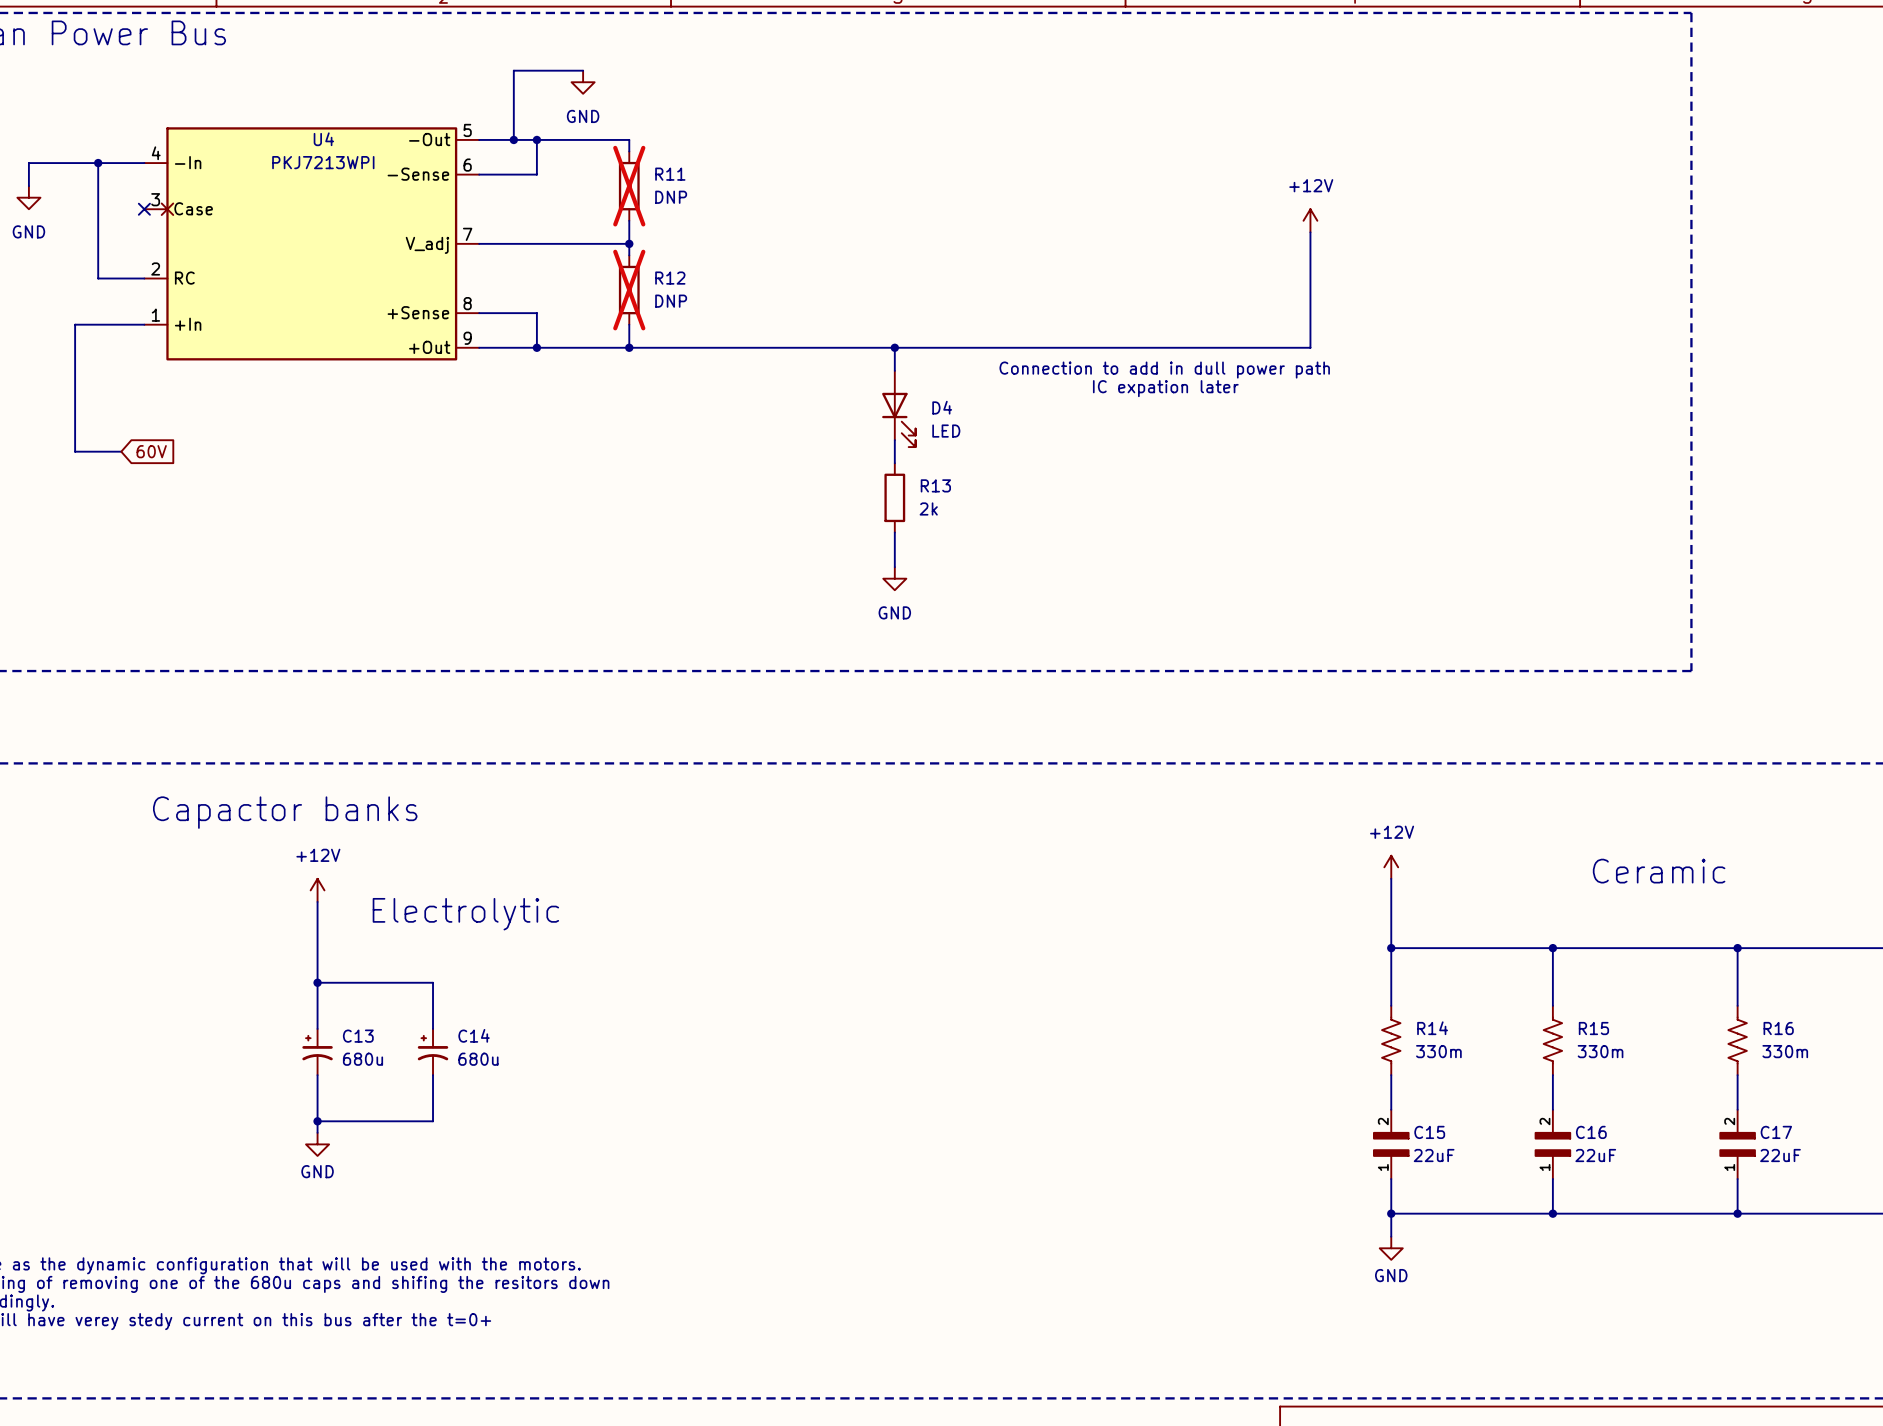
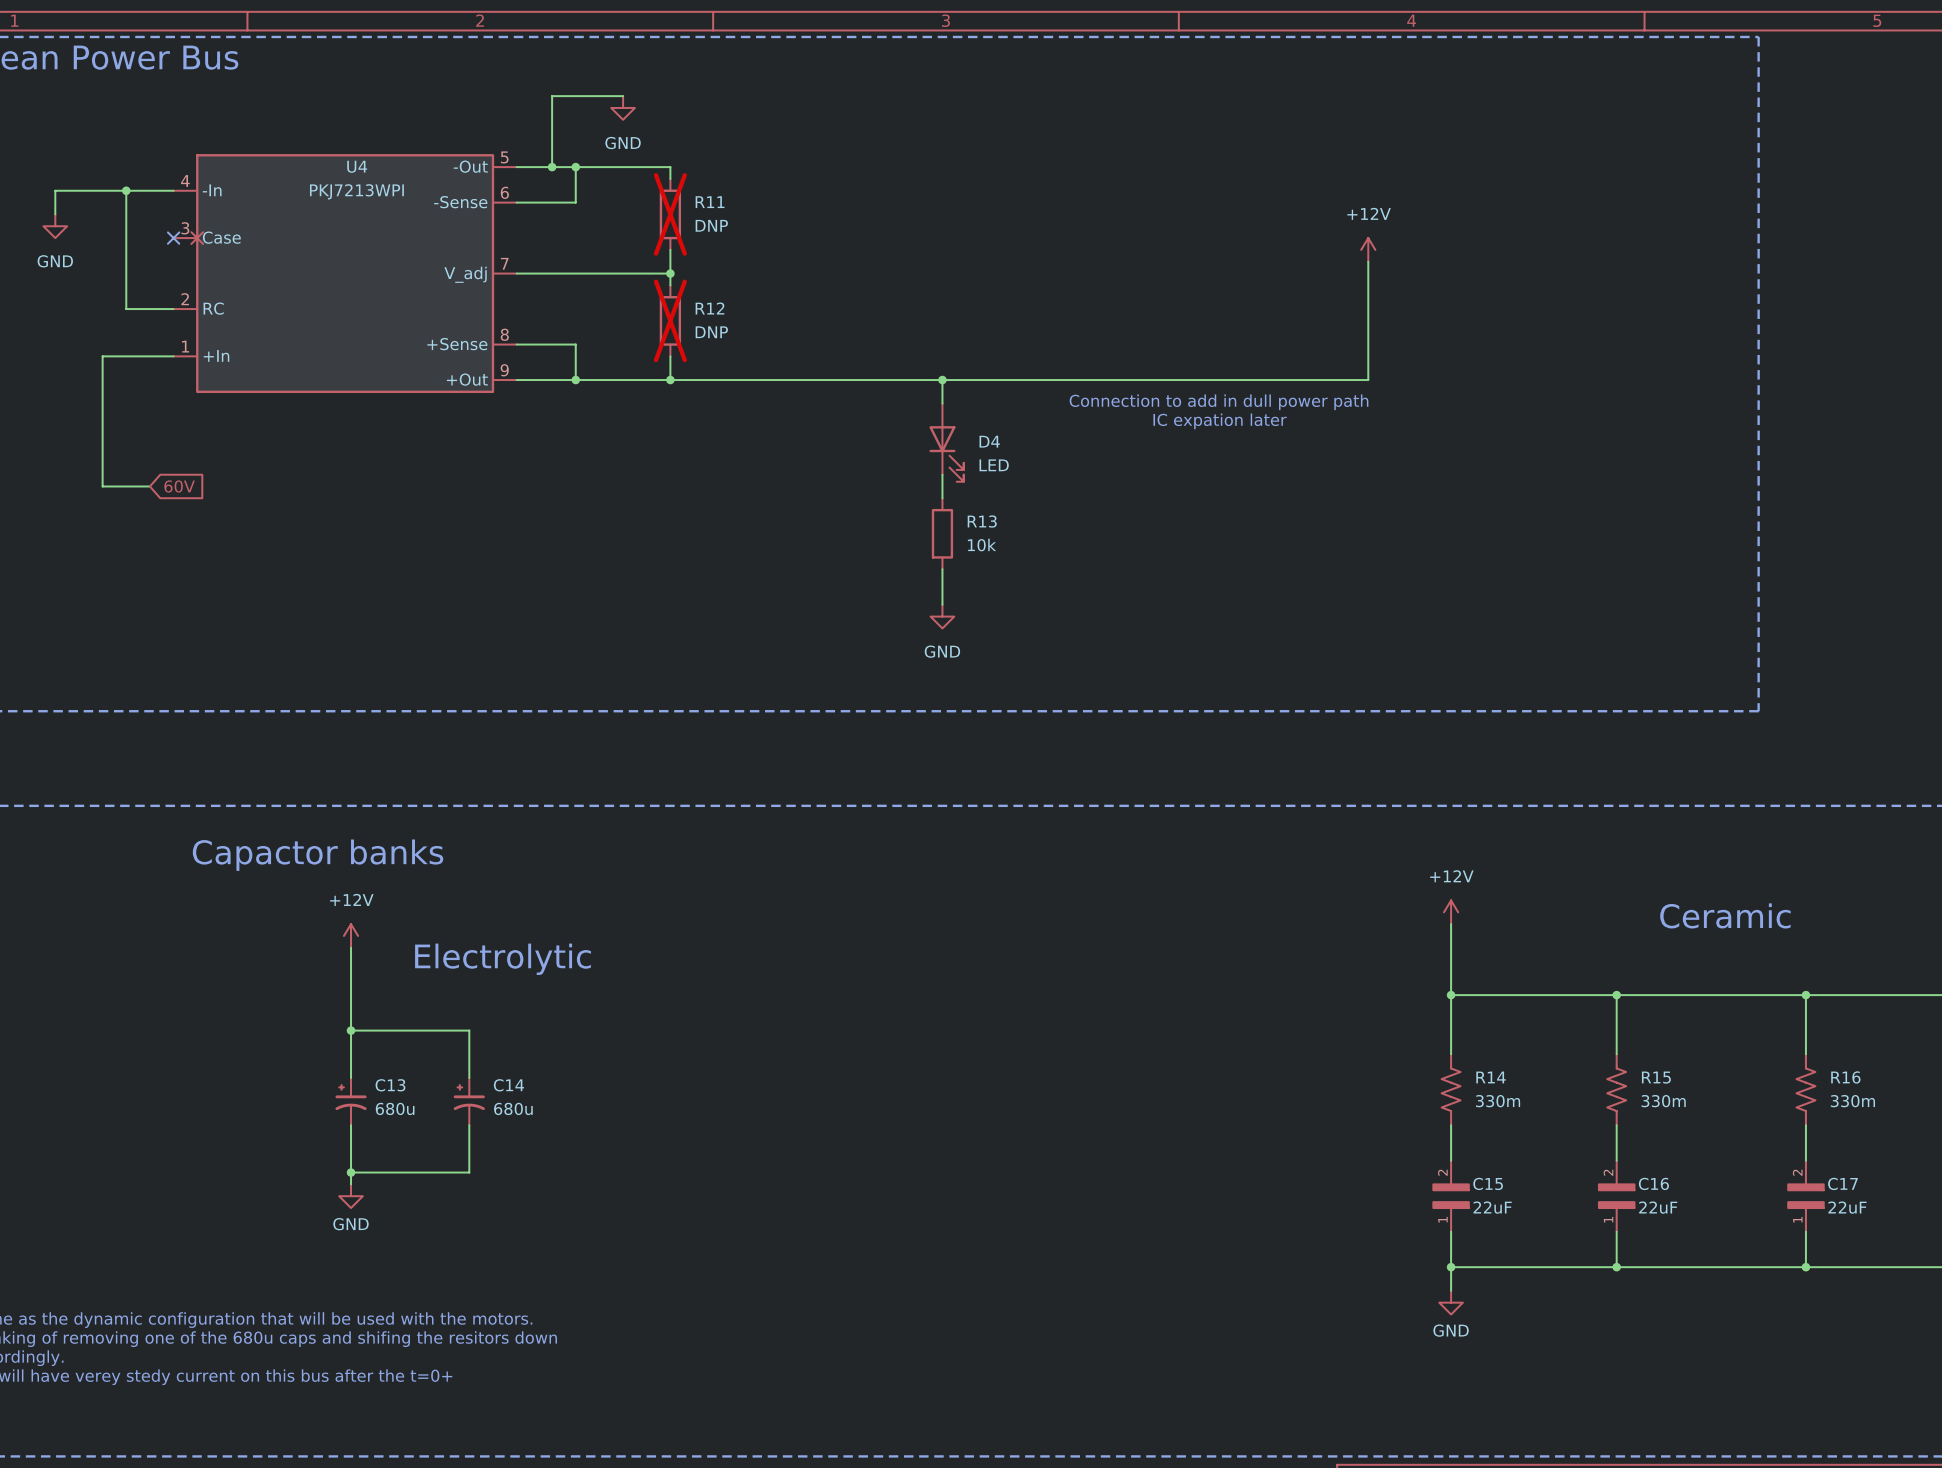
R13 value: 2k (928, 508) -> 10k (982, 545)

